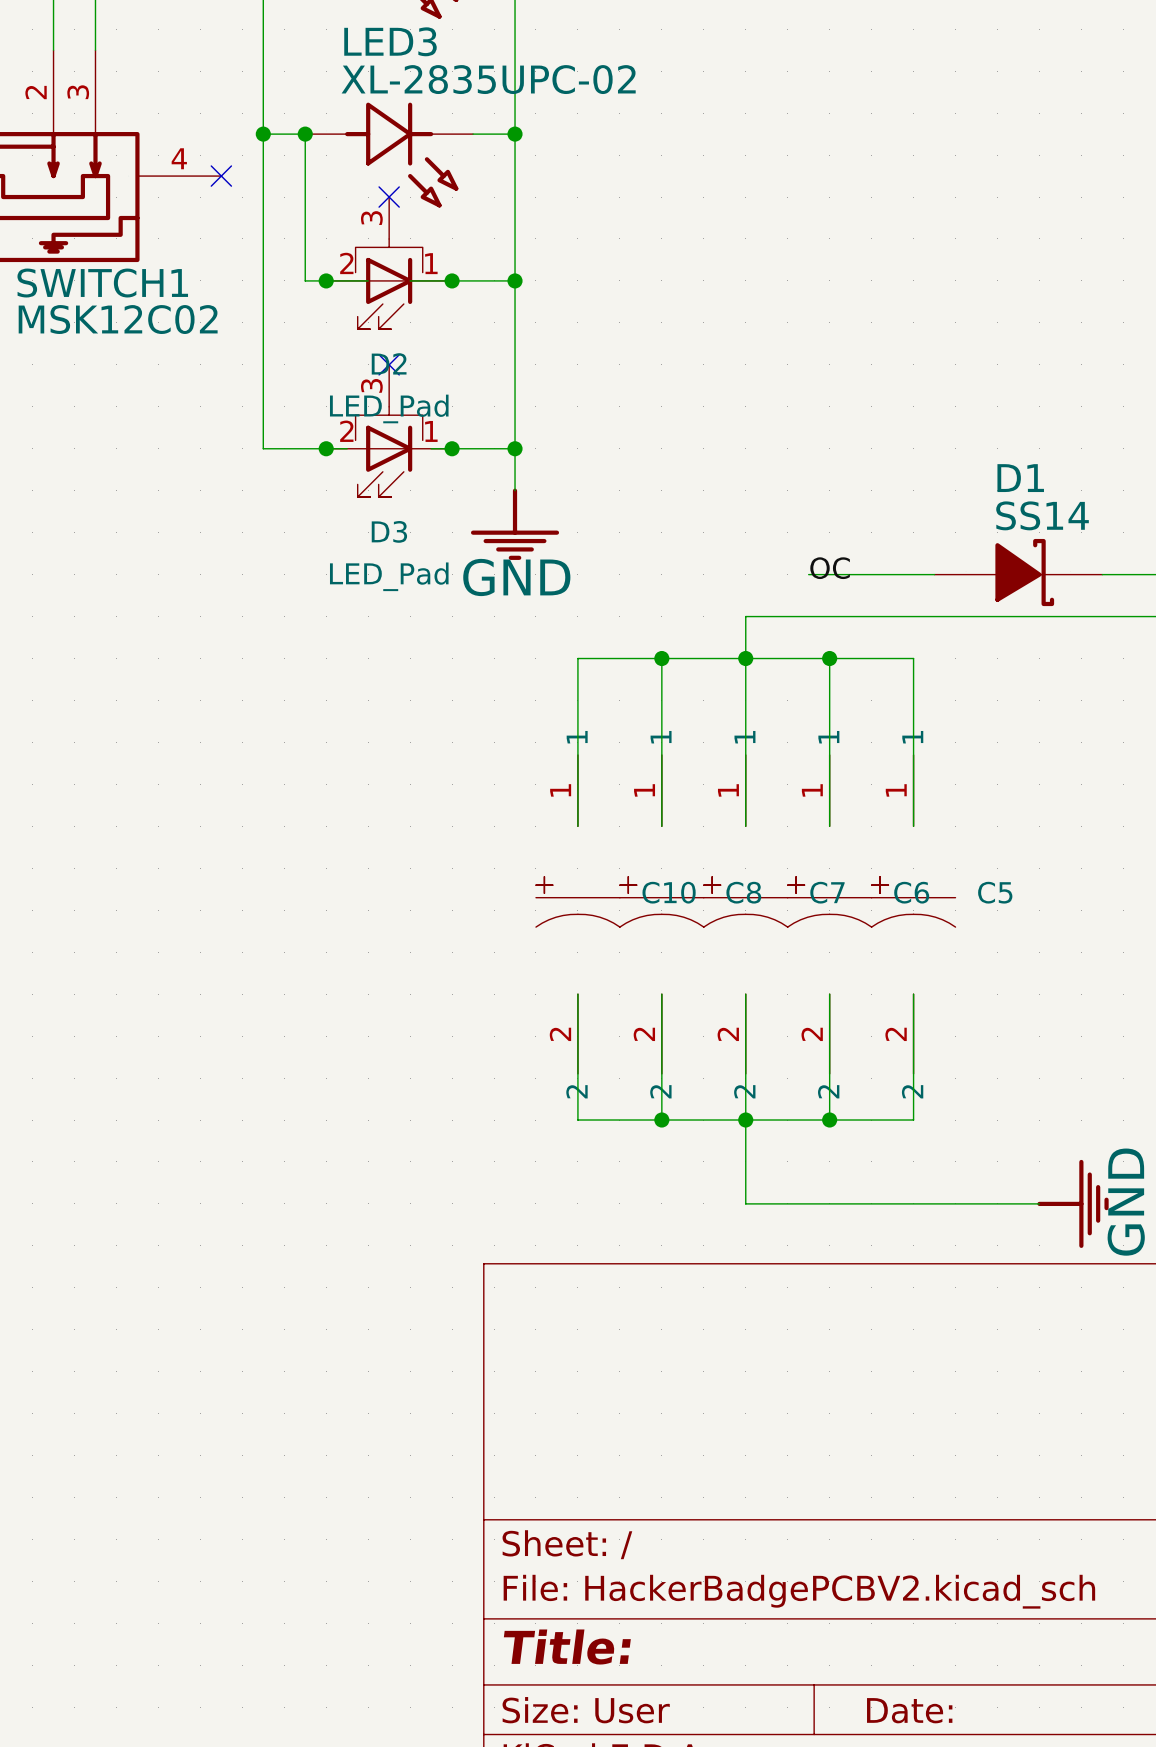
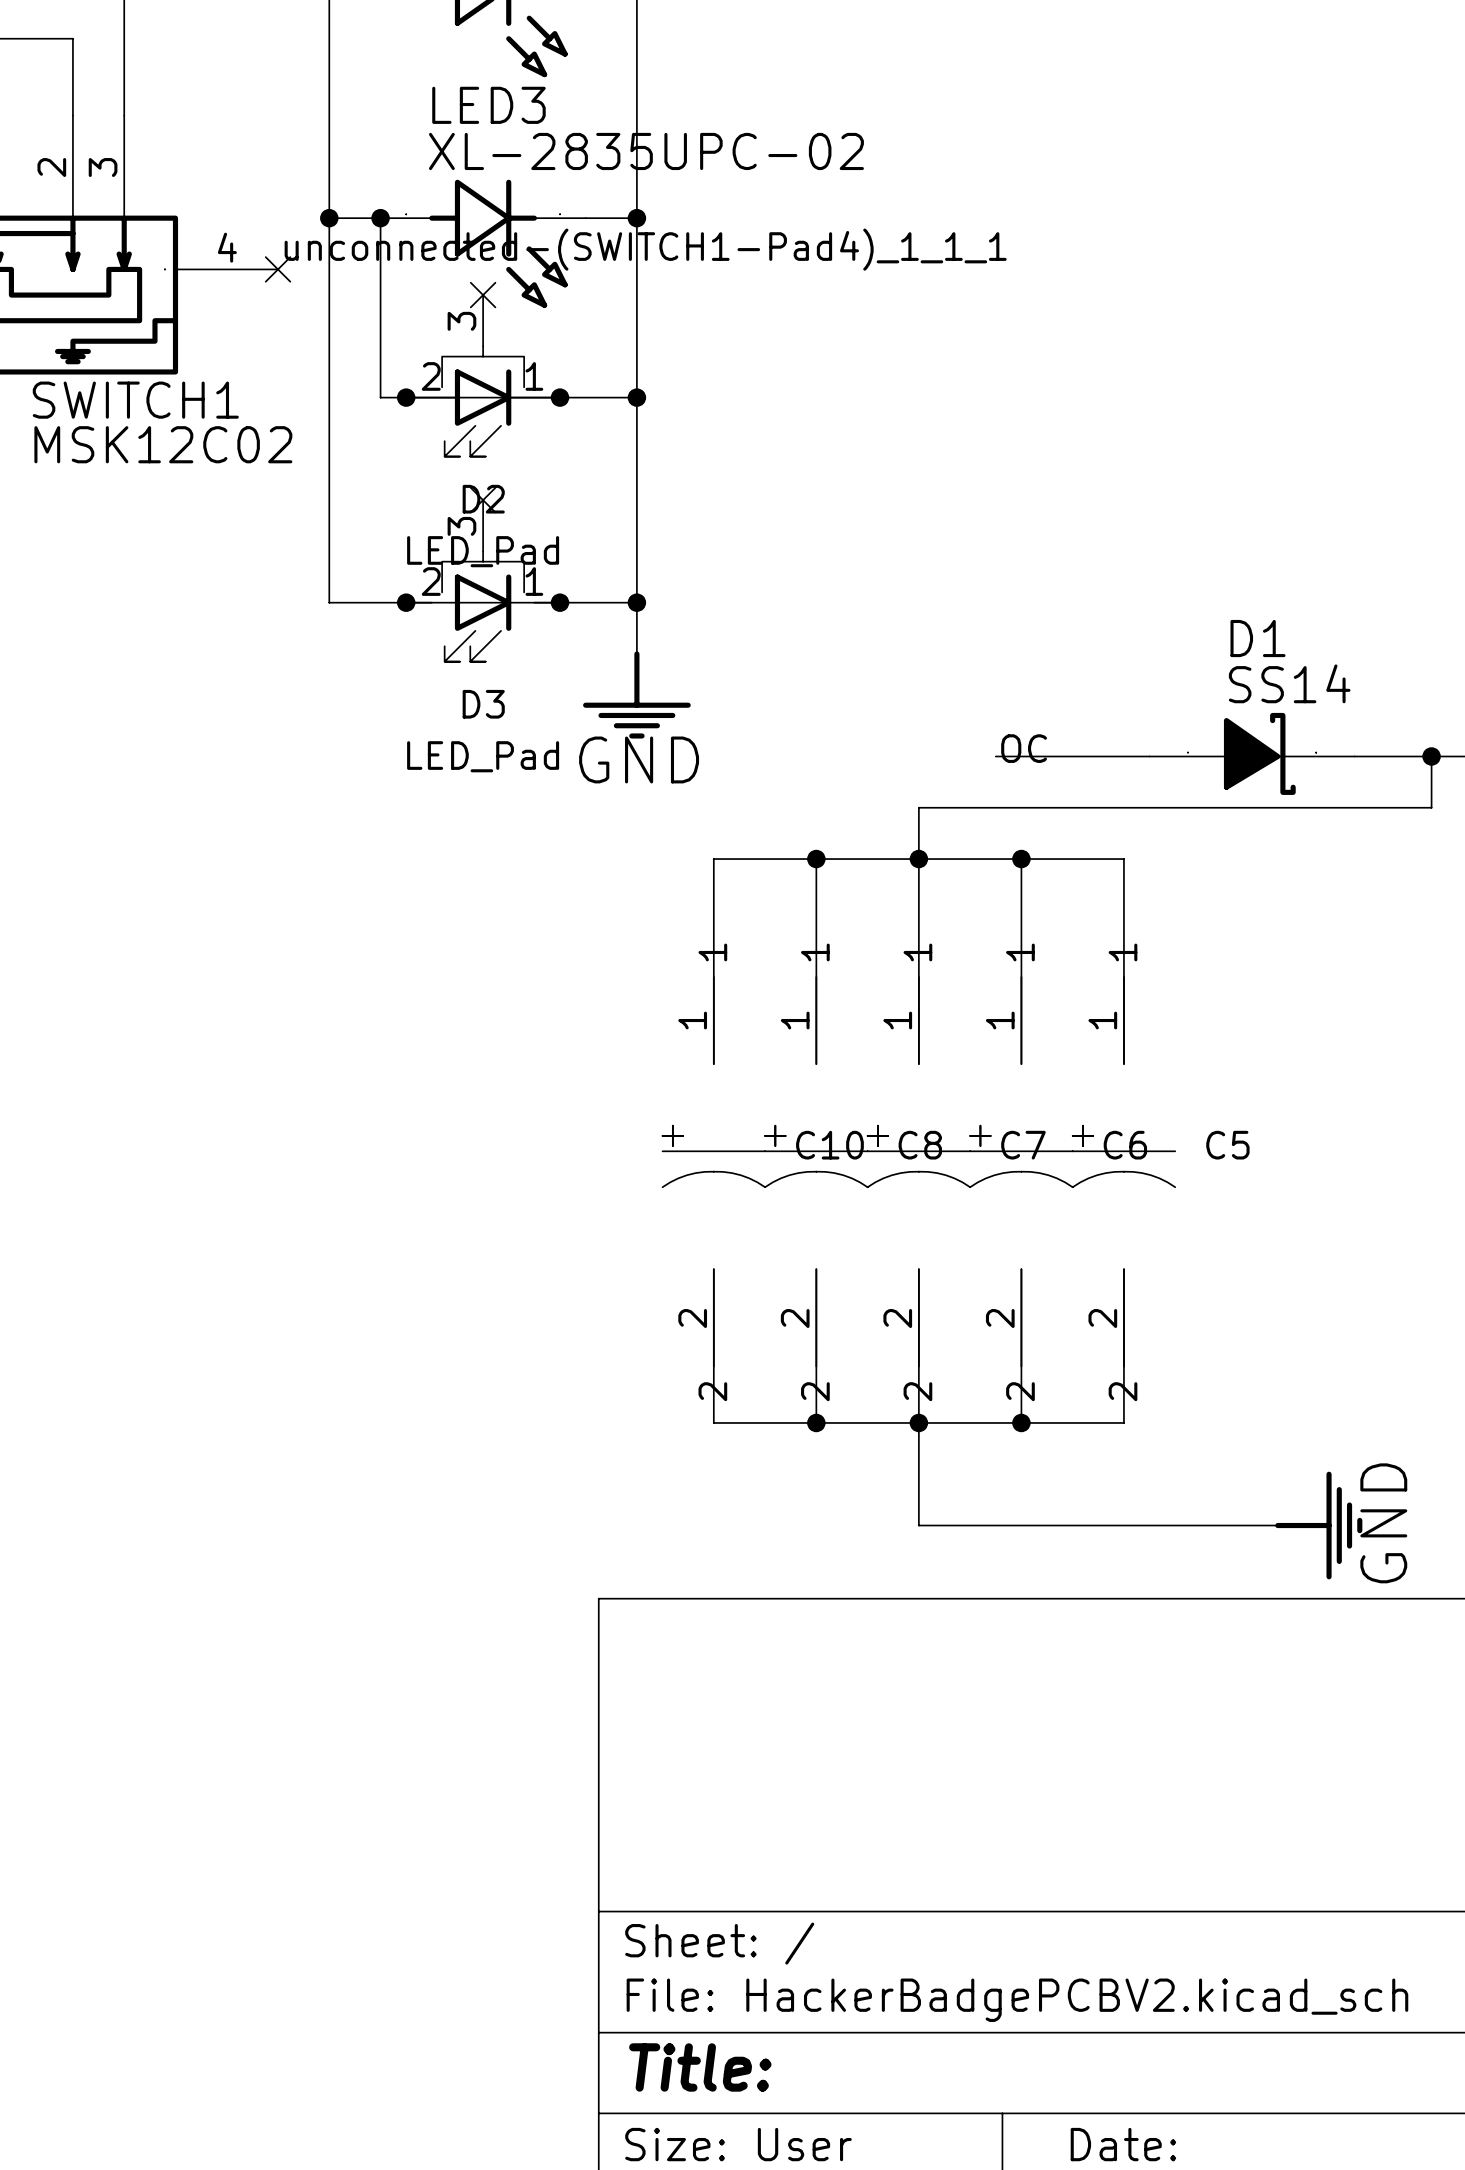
label: none -> unconnected-(SWITCH1-Pad4)_1_1_1 (645, 249)

